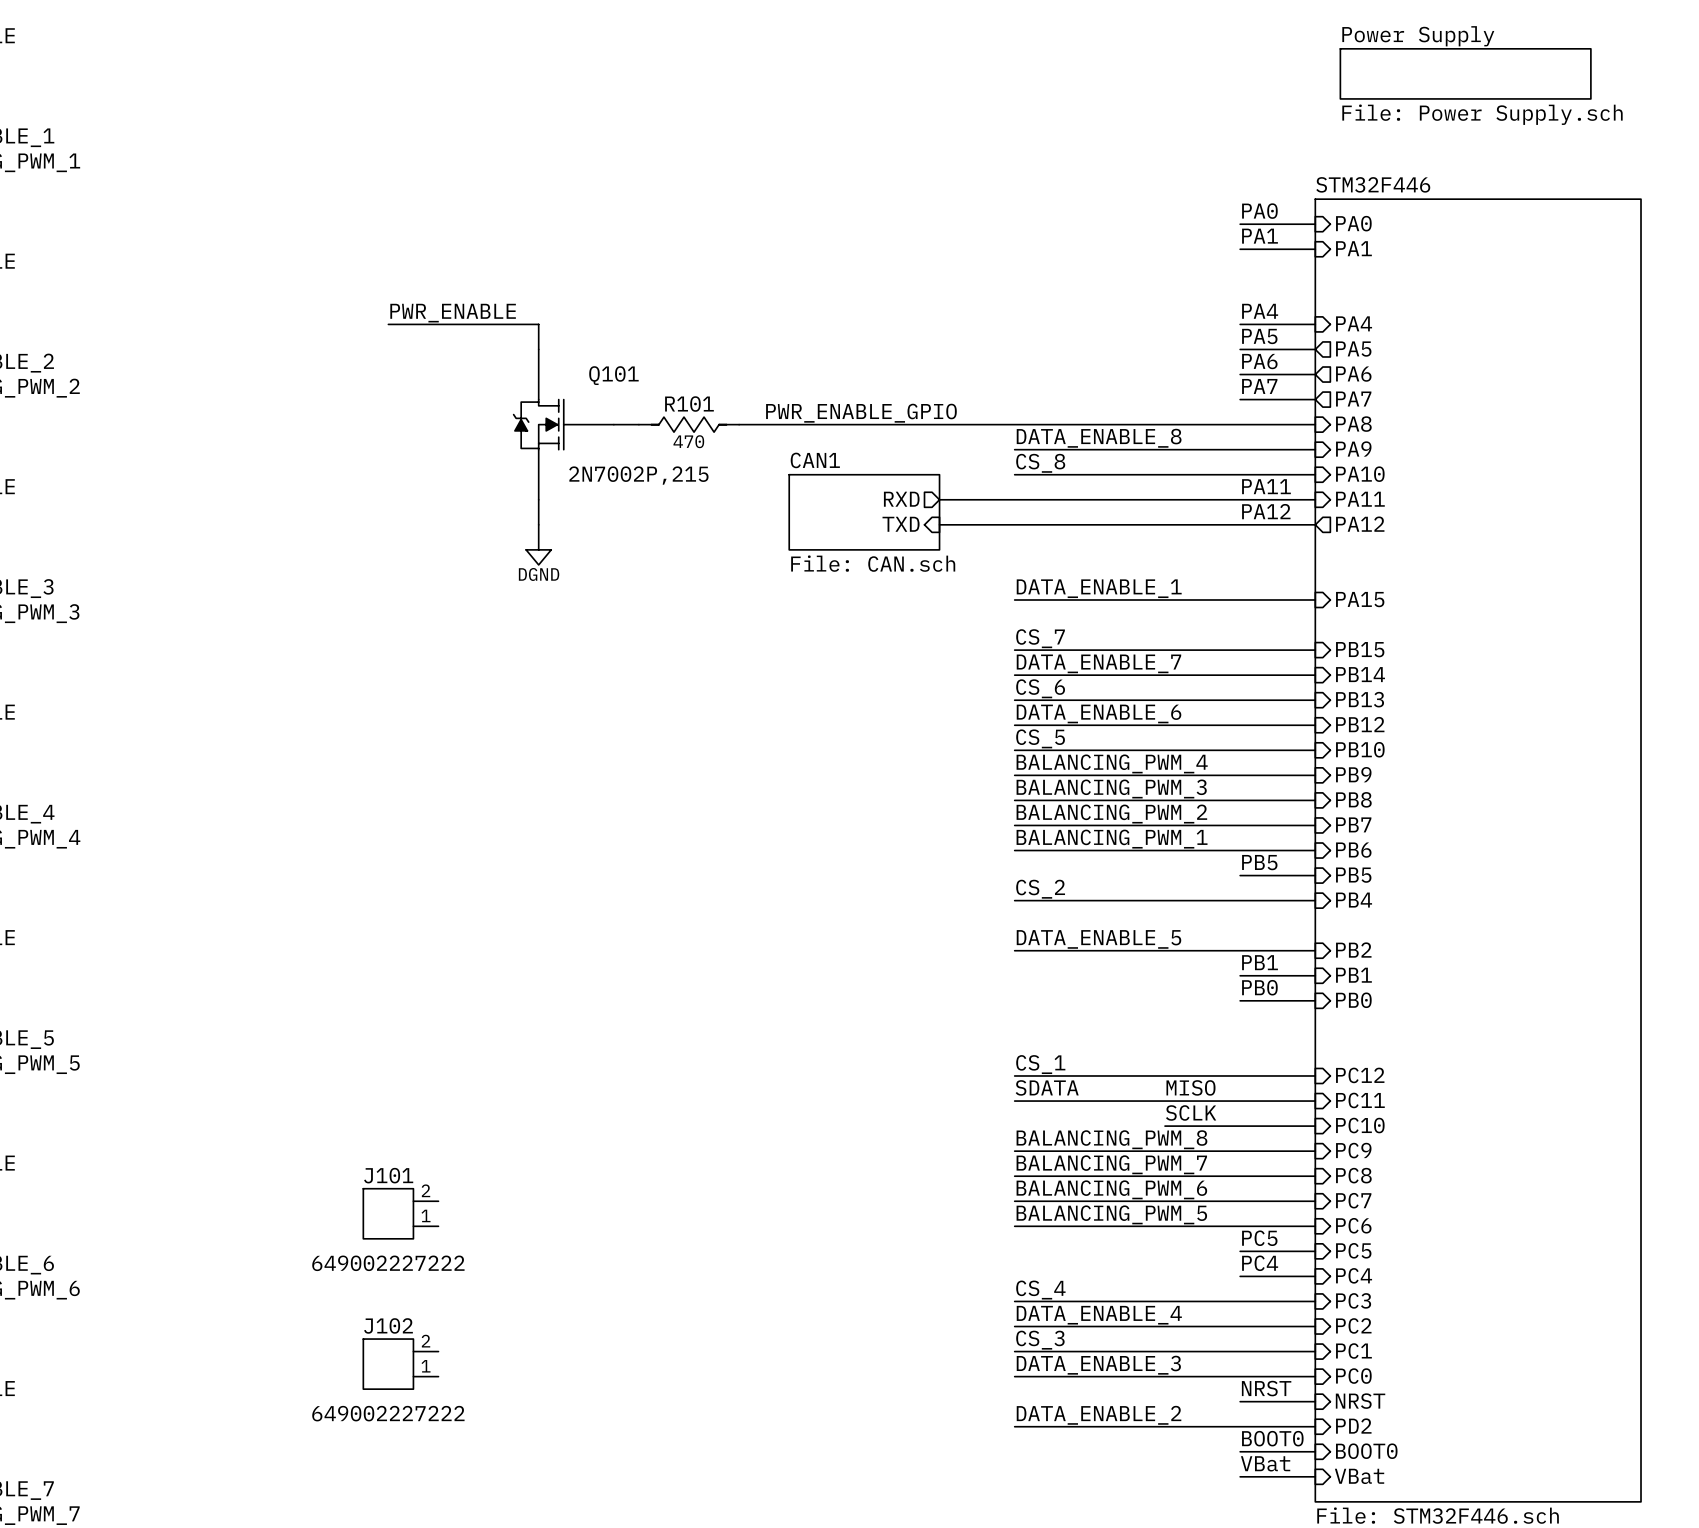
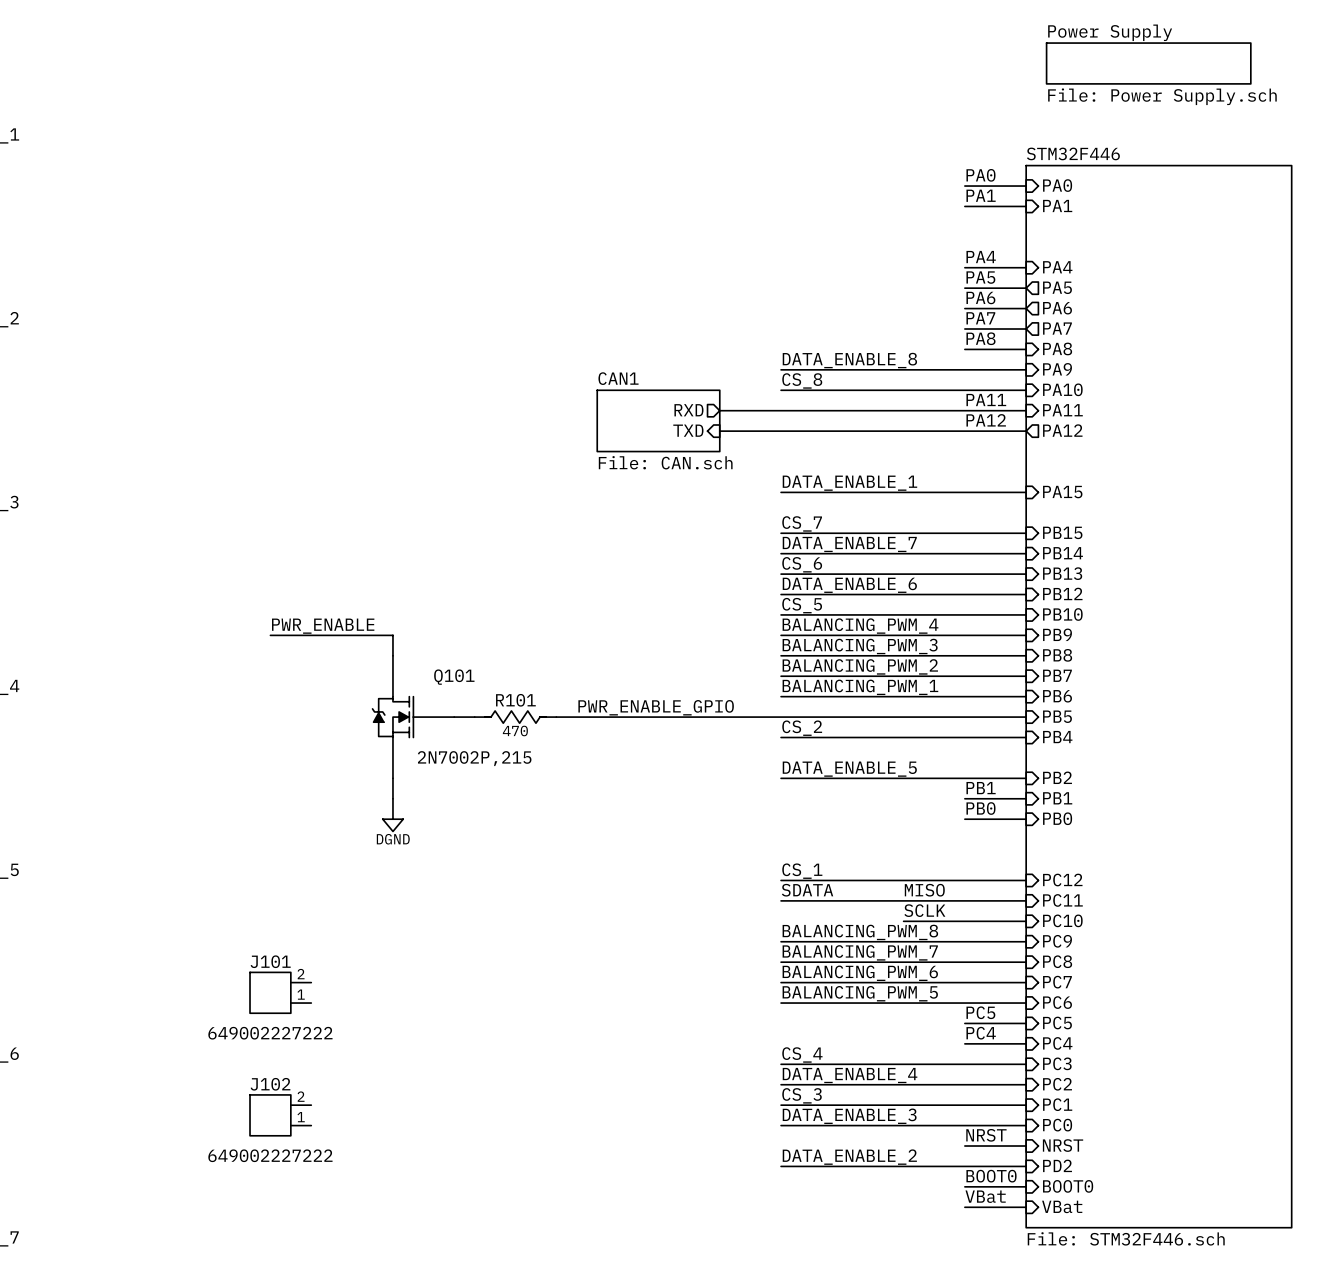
label: PWR_ENABLE (453, 313) -> none
wire: (388, 324) (538, 324) (538, 349) -> none
label: none -> PA8 (980, 338)
label: PWR_ENABLE_GPIO (861, 413) -> none
Q101 position: (563, 424) -> (413, 717)
wire: (613, 424) (638, 424) -> none
R101 position: (689, 424) -> (515, 717)
wire: (739, 424) (1240, 424) -> none
wire: (538, 499) (538, 524) -> none
power symbol: DGND (538, 544) -> none
label: none -> PWR_ENABLE (323, 626)
wire: none -> (270, 635) (392, 635) (392, 655)
label: PB5 (1259, 862) -> none
label: none -> PWR_ENABLE_GPIO (656, 707)
wire: none -> (454, 717) (474, 717)
wire: none -> (556, 717) (964, 717)
wire: none -> (392, 778) (392, 798)
power symbol: none -> DGND (392, 815)

